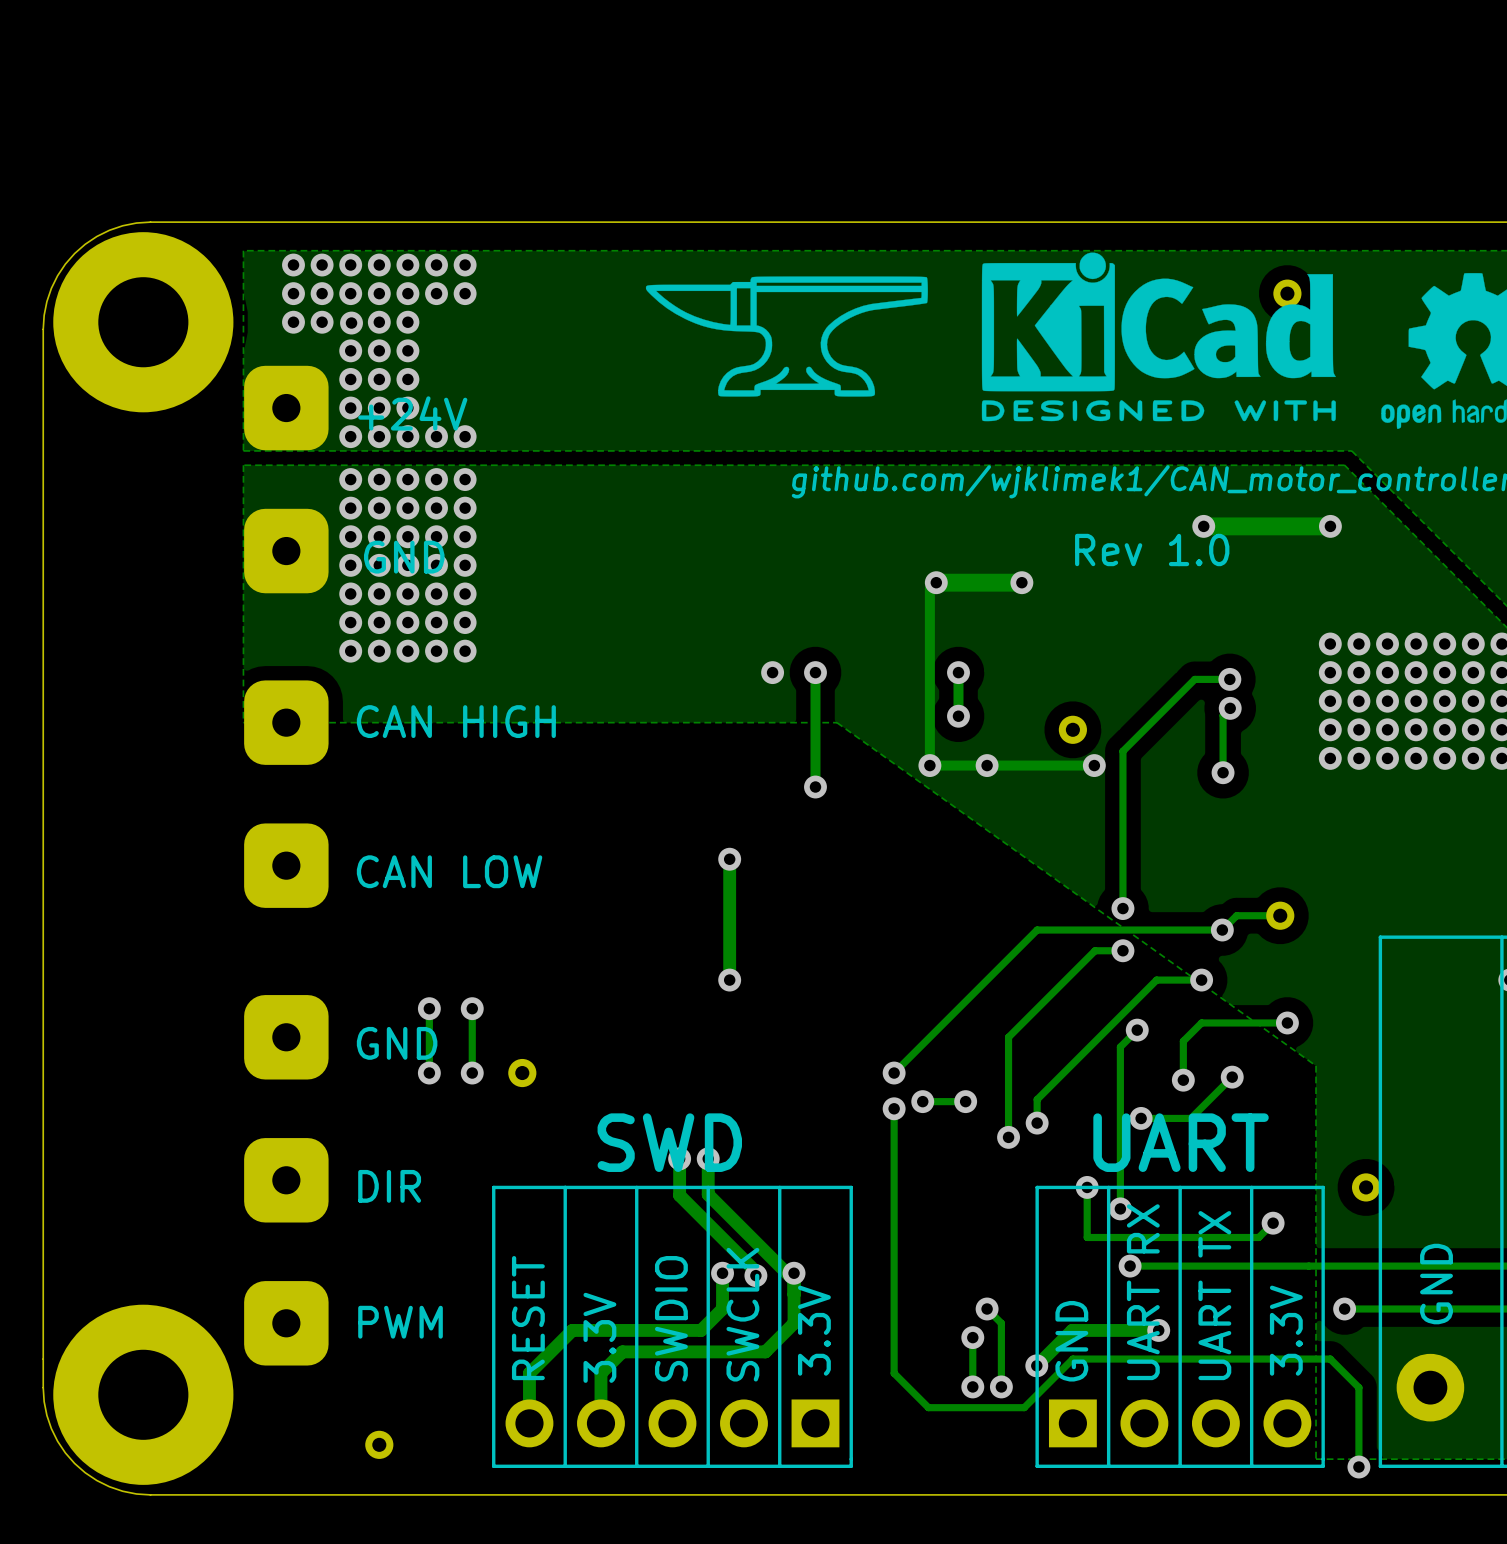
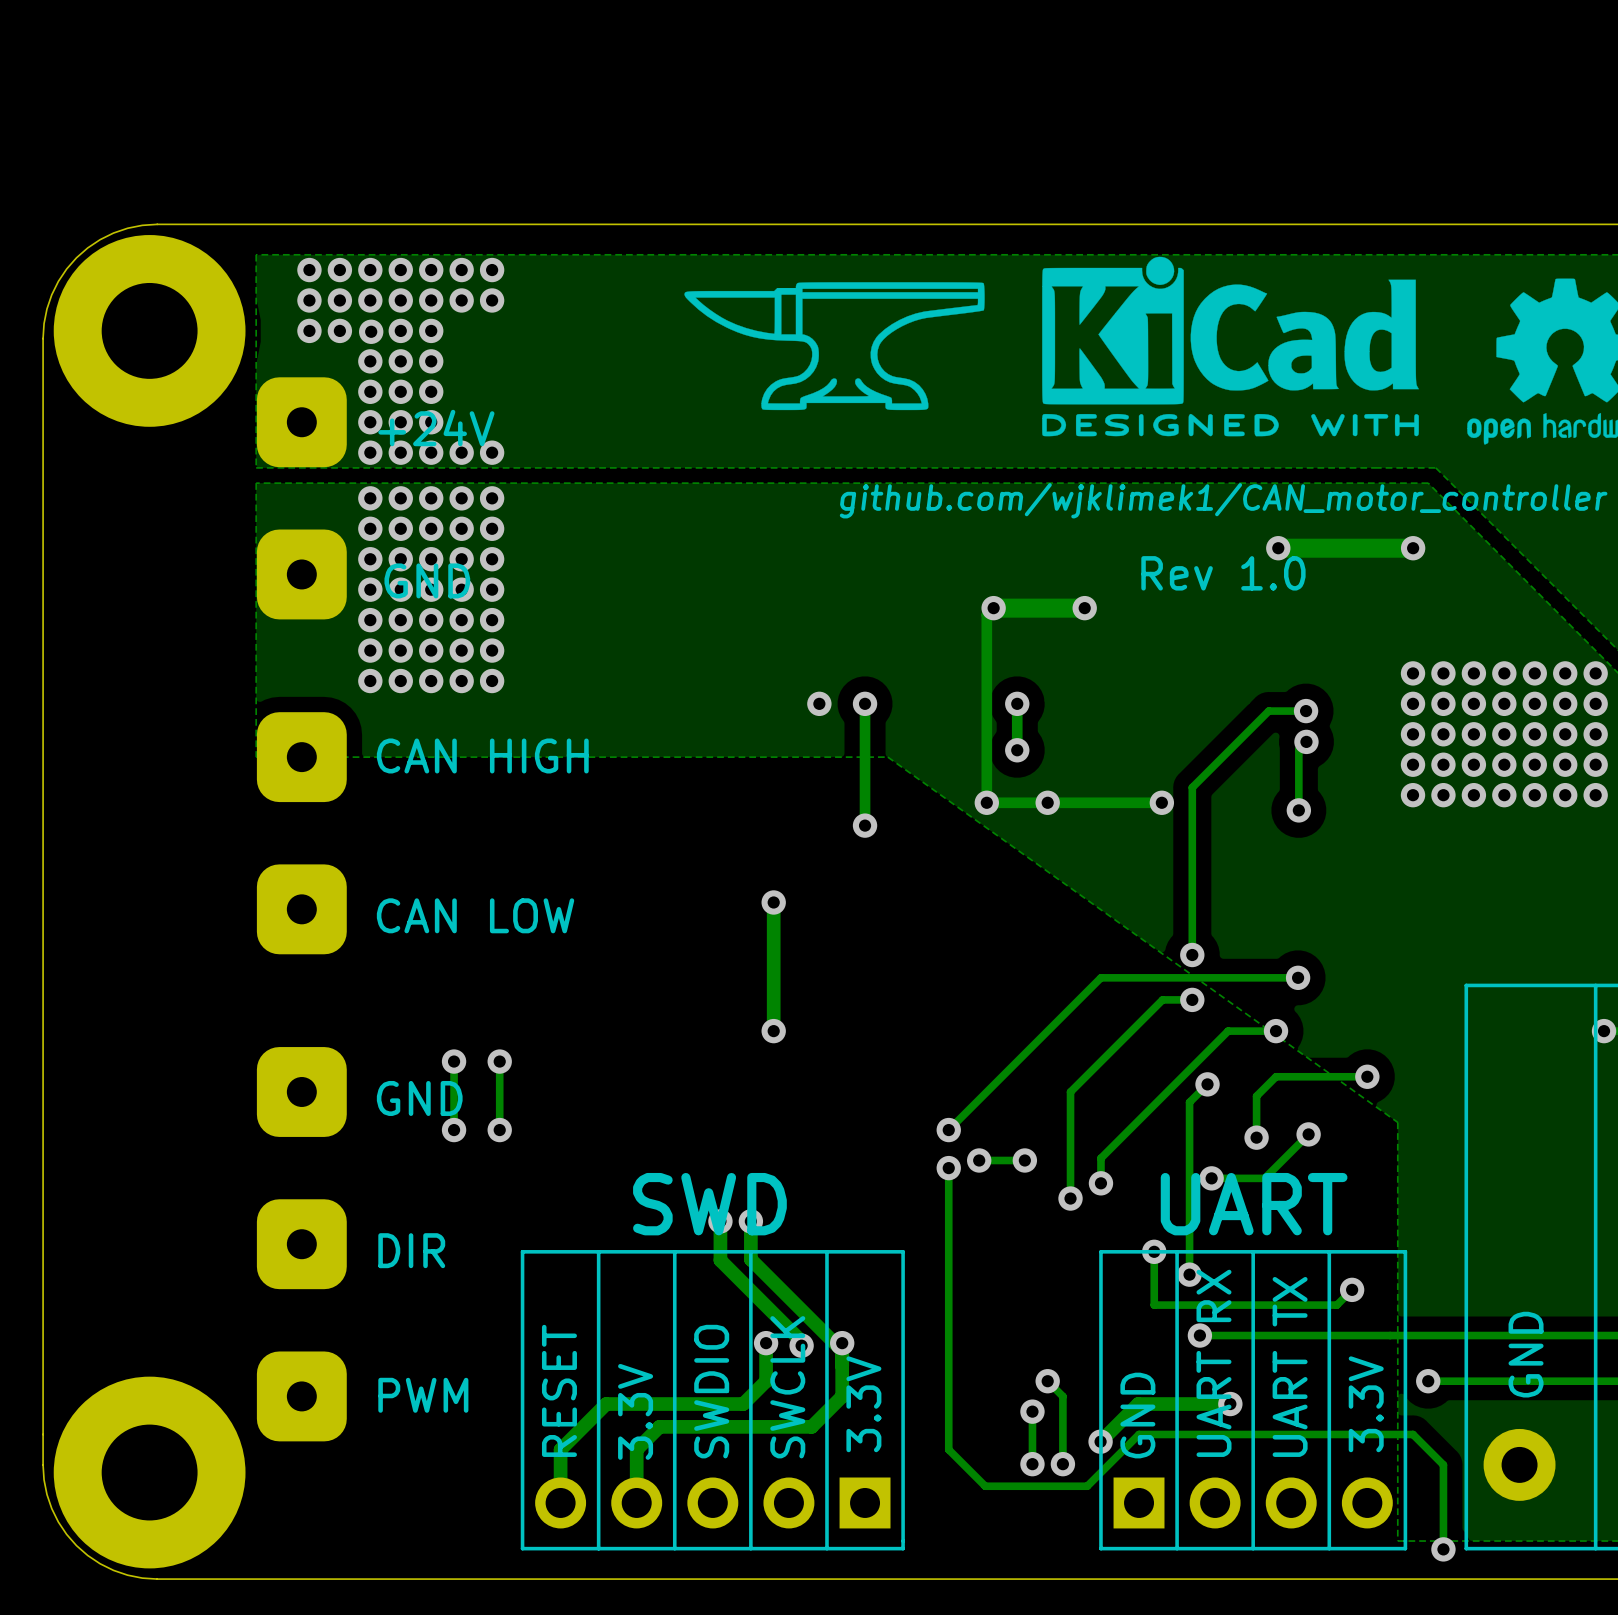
part: (1287, 293) -> none
part: (1072, 729) -> none
track: (1280, 915) (1236, 915) (1222, 930) -> none
part: (1280, 915) -> none
part: (522, 1073) -> none
part: (1366, 1187) -> none
part: (379, 1444) -> none

